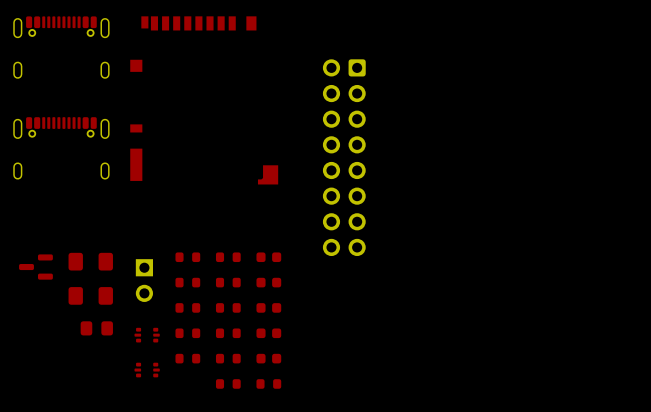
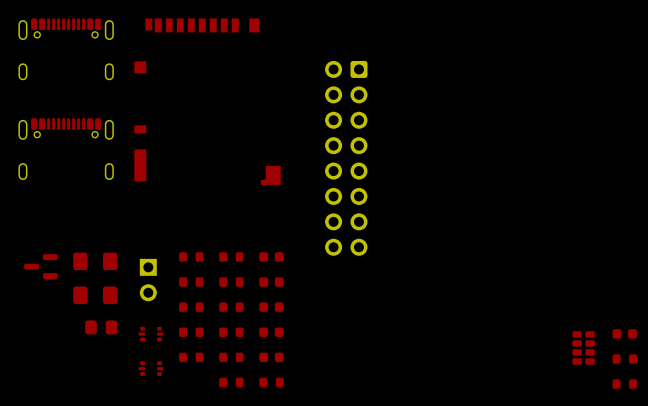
part: none -> (624, 333)
part: none -> (583, 347)
part: none -> (624, 359)
part: none -> (624, 384)

